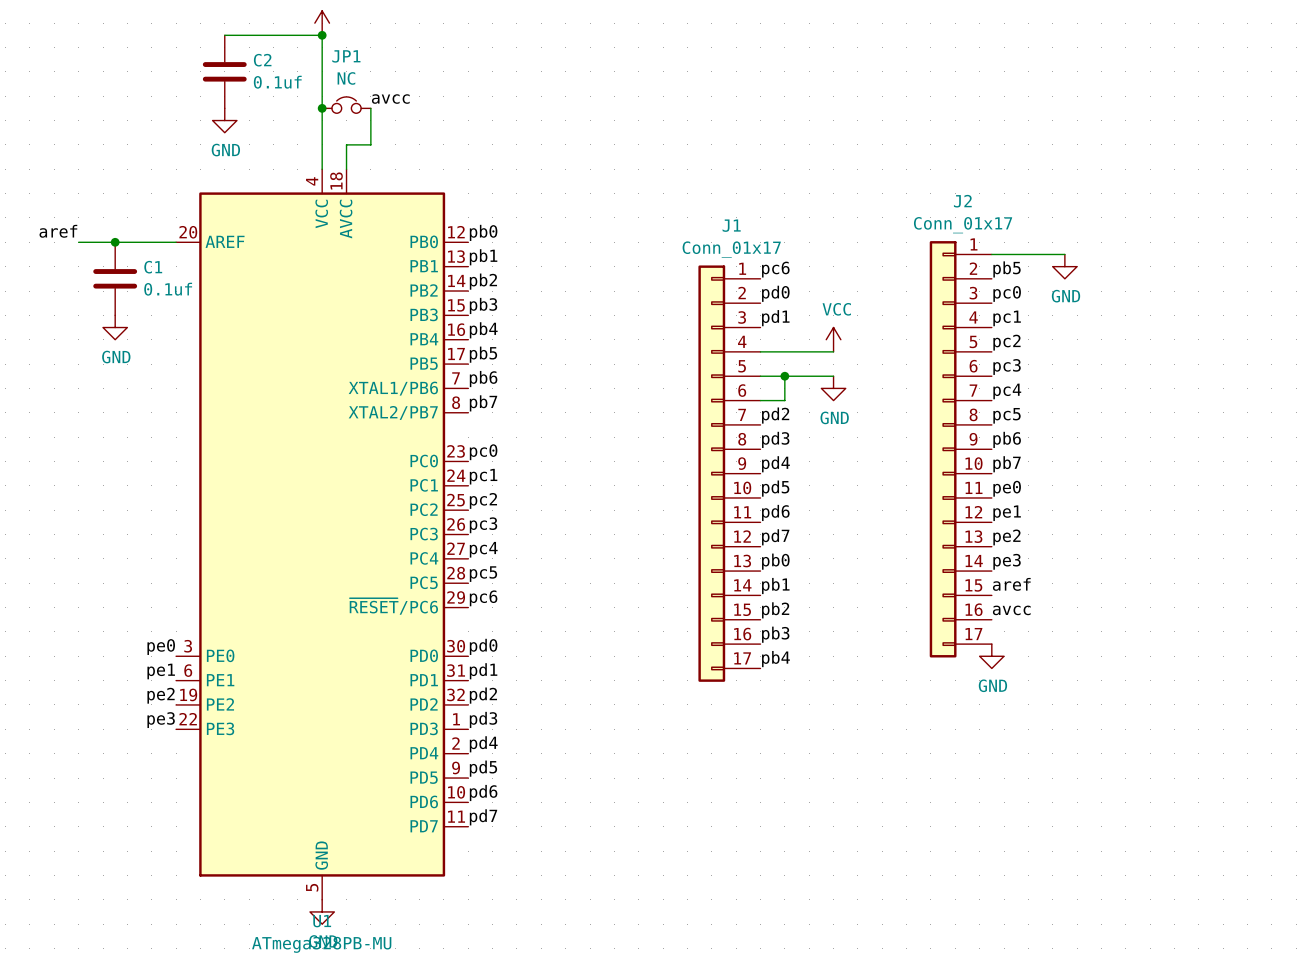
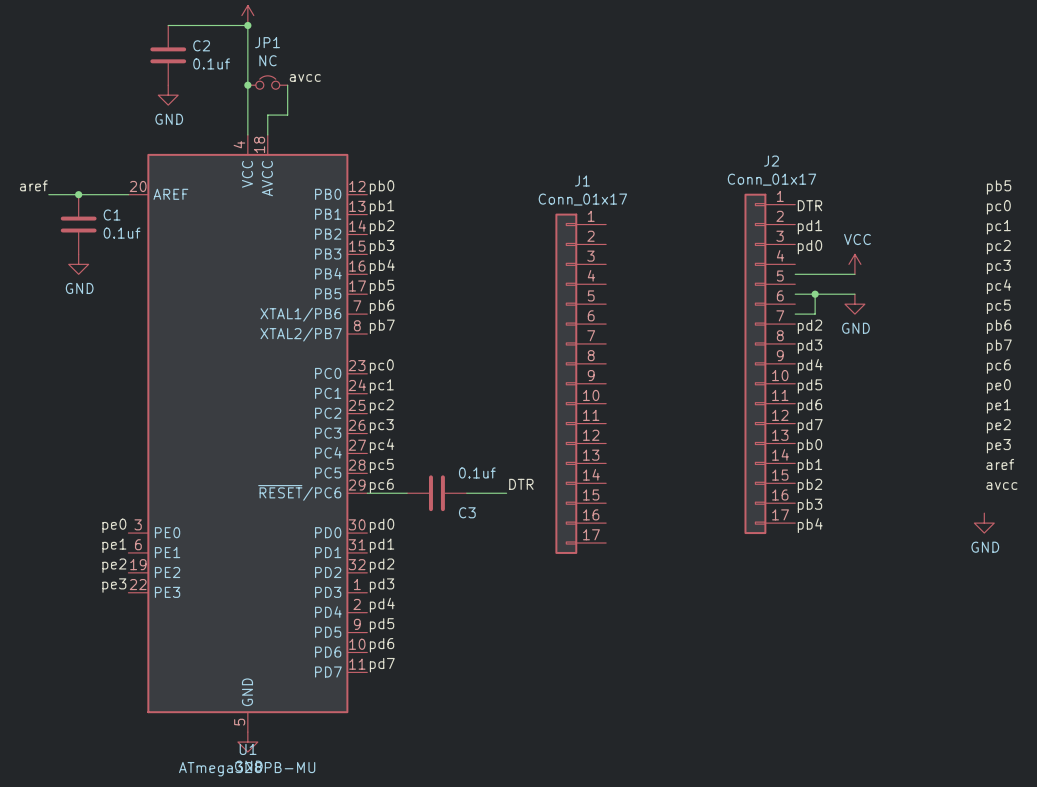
wire: (991, 254) (1064, 254) -> none
label: none -> DTR (809, 205)
power symbol position: GND (1064, 266) -> GND (854, 304)
label: pc6 (775, 269) -> none
label position: pb5 (1007, 269) -> pb5 (999, 187)
label position: pd0 (775, 293) -> pd0 (809, 247)
label position: pc0 (1007, 293) -> pc0 (998, 207)
label position: pd1 (775, 318) -> pd1 (809, 227)
label position: pc1 (1007, 318) -> pc1 (998, 227)
power symbol position: VCC (833, 339) -> VCC (854, 264)
label position: pc2 (1006, 342) -> pc2 (998, 247)
wire: (760, 351) (833, 351) -> (795, 274) (854, 274)
junction: none -> (815, 294)
label position: pc3 (1007, 366) -> pc3 (998, 267)
wire: (760, 376) (833, 376) -> (795, 294) (854, 294)
wire: (784, 376) (784, 400) (760, 400) -> (815, 294) (815, 314) (795, 314)
junction: (784, 376) -> none
power symbol: GND (833, 388) -> none
label position: pc4 (1007, 391) -> pc4 (999, 286)
label position: pd2 (775, 415) -> pd2 (809, 326)
label position: pc5 (1007, 415) -> pc5 (998, 306)
label position: pd3 (775, 439) -> pd3 (809, 346)
label position: pb6 (1007, 439) -> pb6 (999, 326)
label: none -> pc6 (998, 366)
label position: pd4 (775, 464) -> pd4 (810, 366)
label position: pb7 (1007, 464) -> pb7 (999, 346)
label position: pd5 (775, 488) -> pd5 (809, 386)
label position: pe0 (1007, 488) -> pe0 (998, 386)
label position: pd6 (775, 512) -> pd6 (809, 406)
label position: pe1 (1007, 513) -> pe1 (998, 406)
label position: pd7 (775, 537) -> pd7 (810, 426)
label position: pe2 (1006, 537) -> pe2 (998, 426)
label position: pb0 (775, 561) -> pb0 (809, 446)
label position: pe3 (1007, 561) -> pe3 (998, 446)
label position: aref (1011, 584) -> aref (1000, 464)
label position: pb1 (775, 586) -> pb1 (809, 466)
label: none -> DTR (521, 484)
wire: none -> (367, 493) (407, 493)
C3: none -> 0.1uf (436, 493)
wire: none -> (466, 493) (506, 493)
label position: pb2 (775, 610) -> pb2 (809, 486)
label position: avcc (1011, 610) -> avcc (1001, 486)
label position: pb3 (775, 634) -> pb3 (809, 505)
power symbol: none -> GND (984, 523)
power symbol: GND (991, 656) -> none
label position: pb4 (775, 659) -> pb4 (810, 525)

